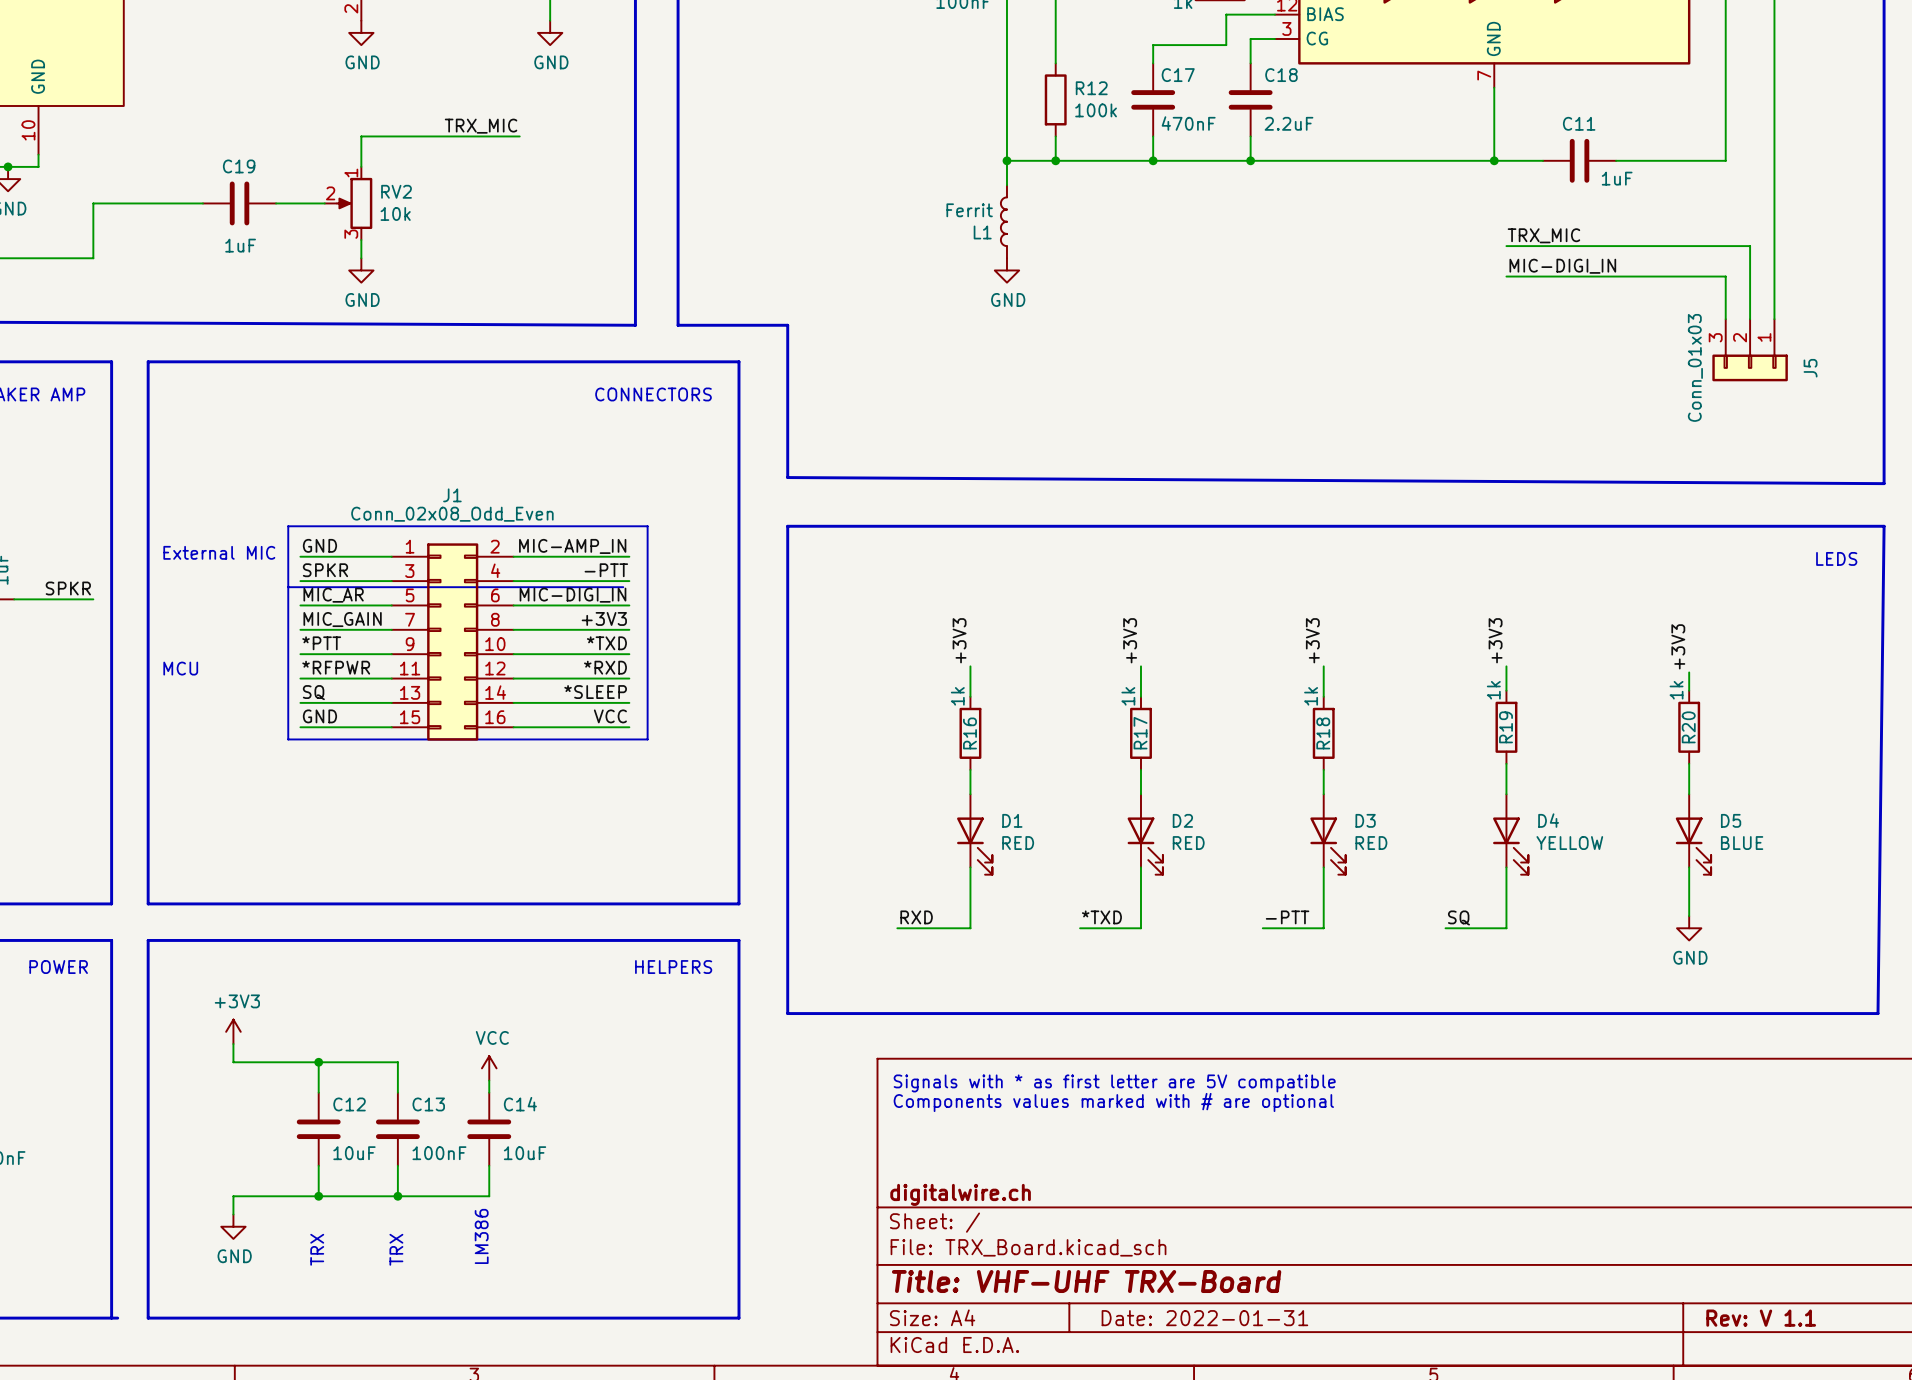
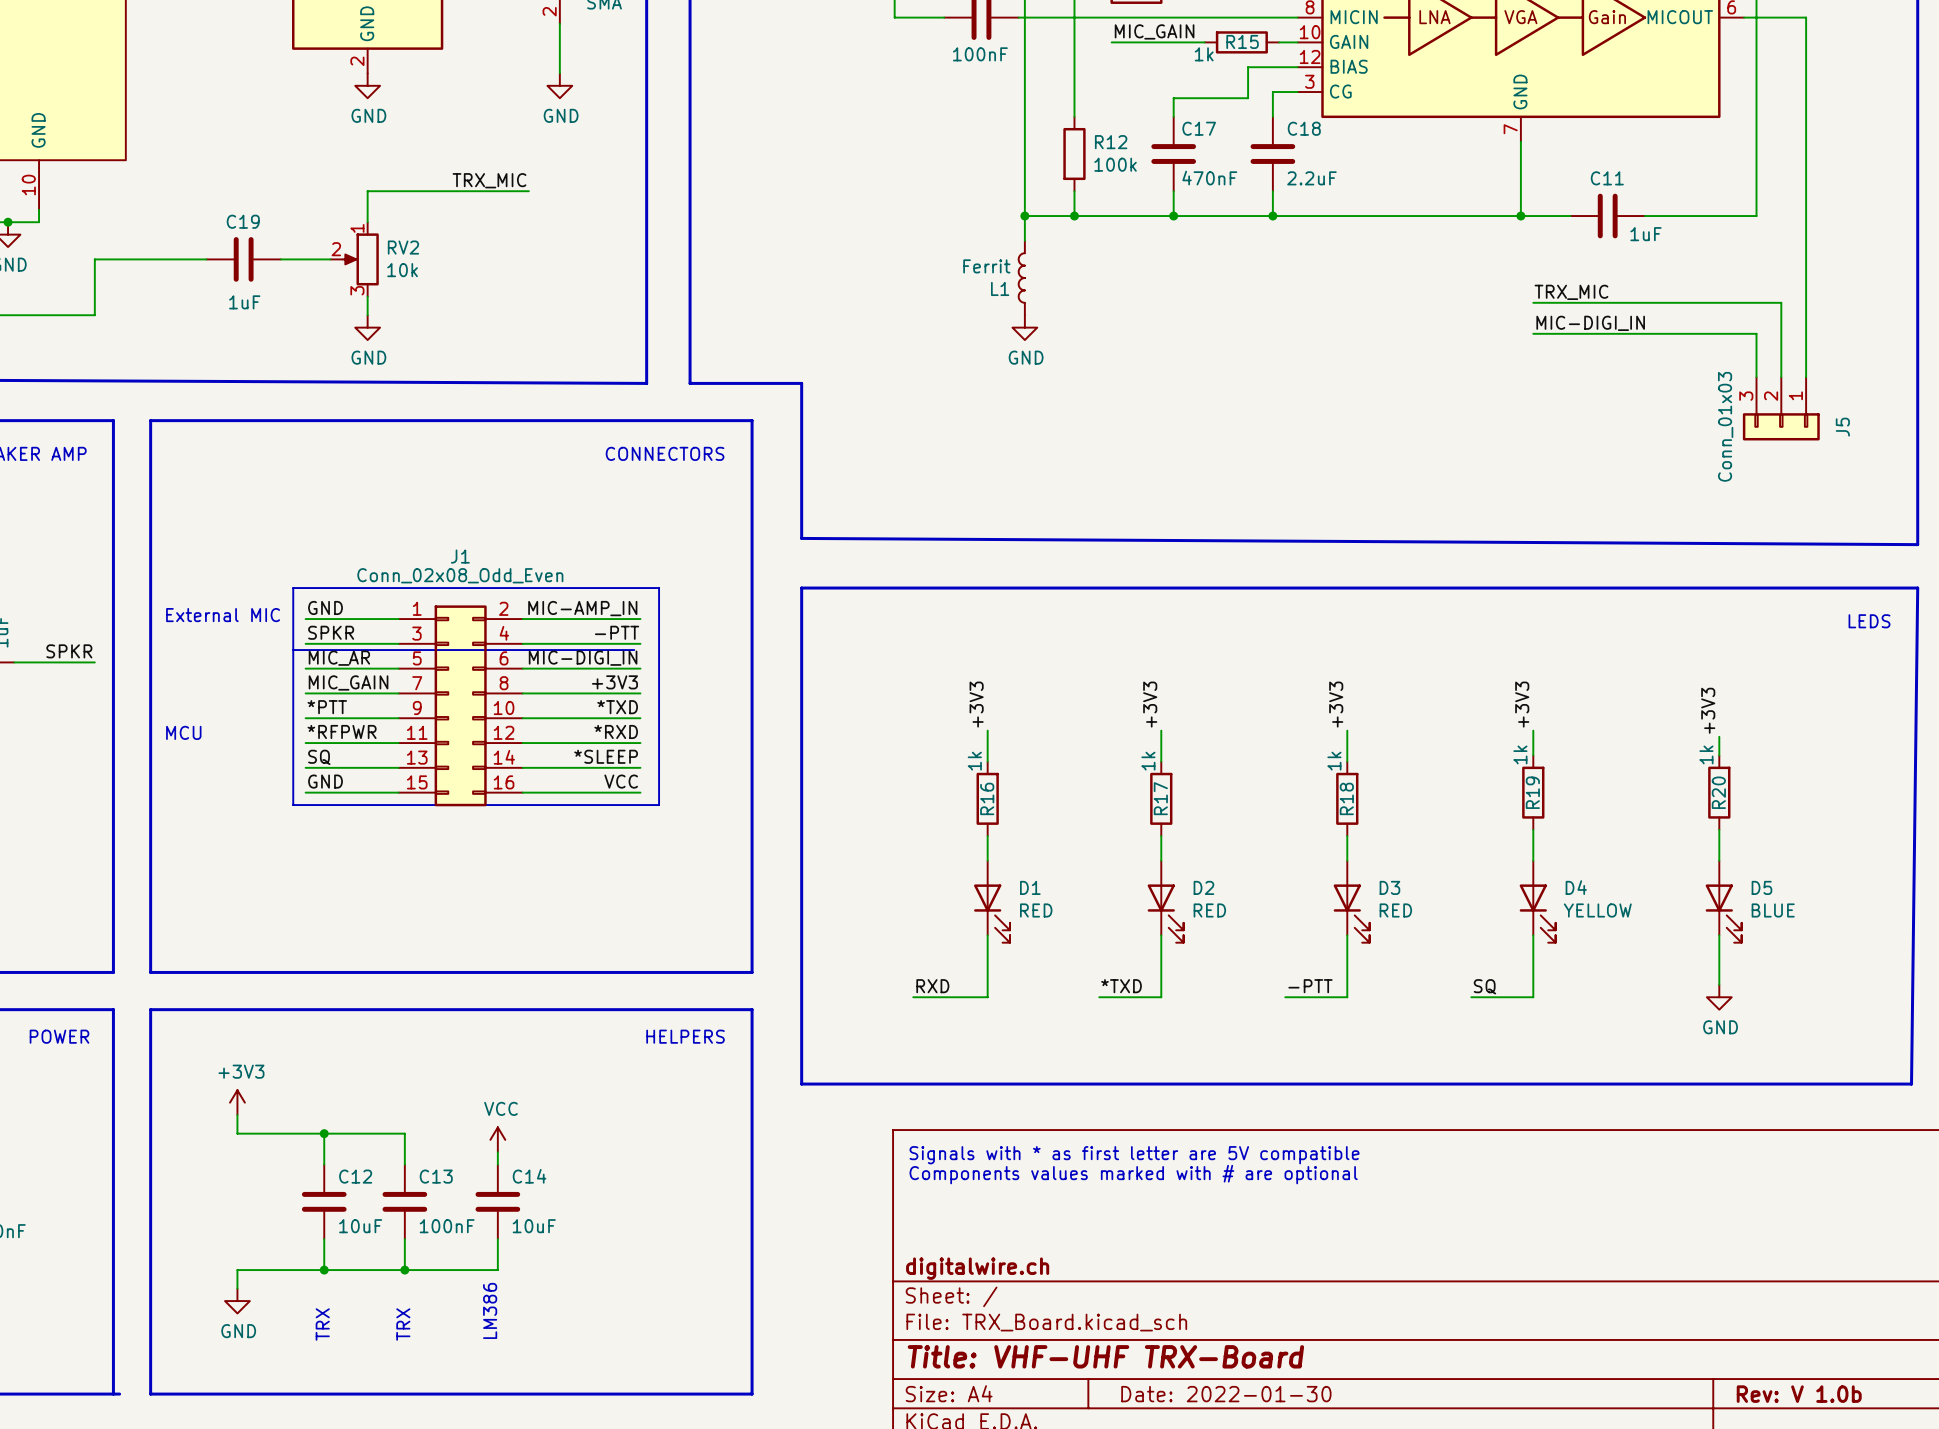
title block: Date: 2022-01-31 (1204, 1318) -> Date: 2022-01-30 (1226, 1394)
title block: Rev: V 1.1 (1761, 1318) -> Rev: V 1.0b (1799, 1394)

